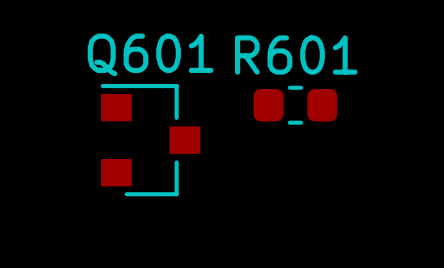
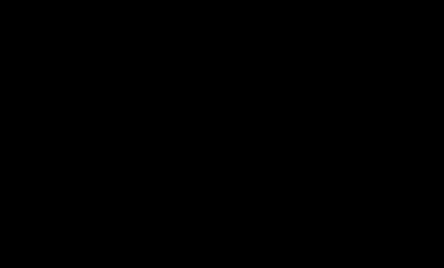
R601: (295, 105) -> none
Q601: (150, 140) -> none

